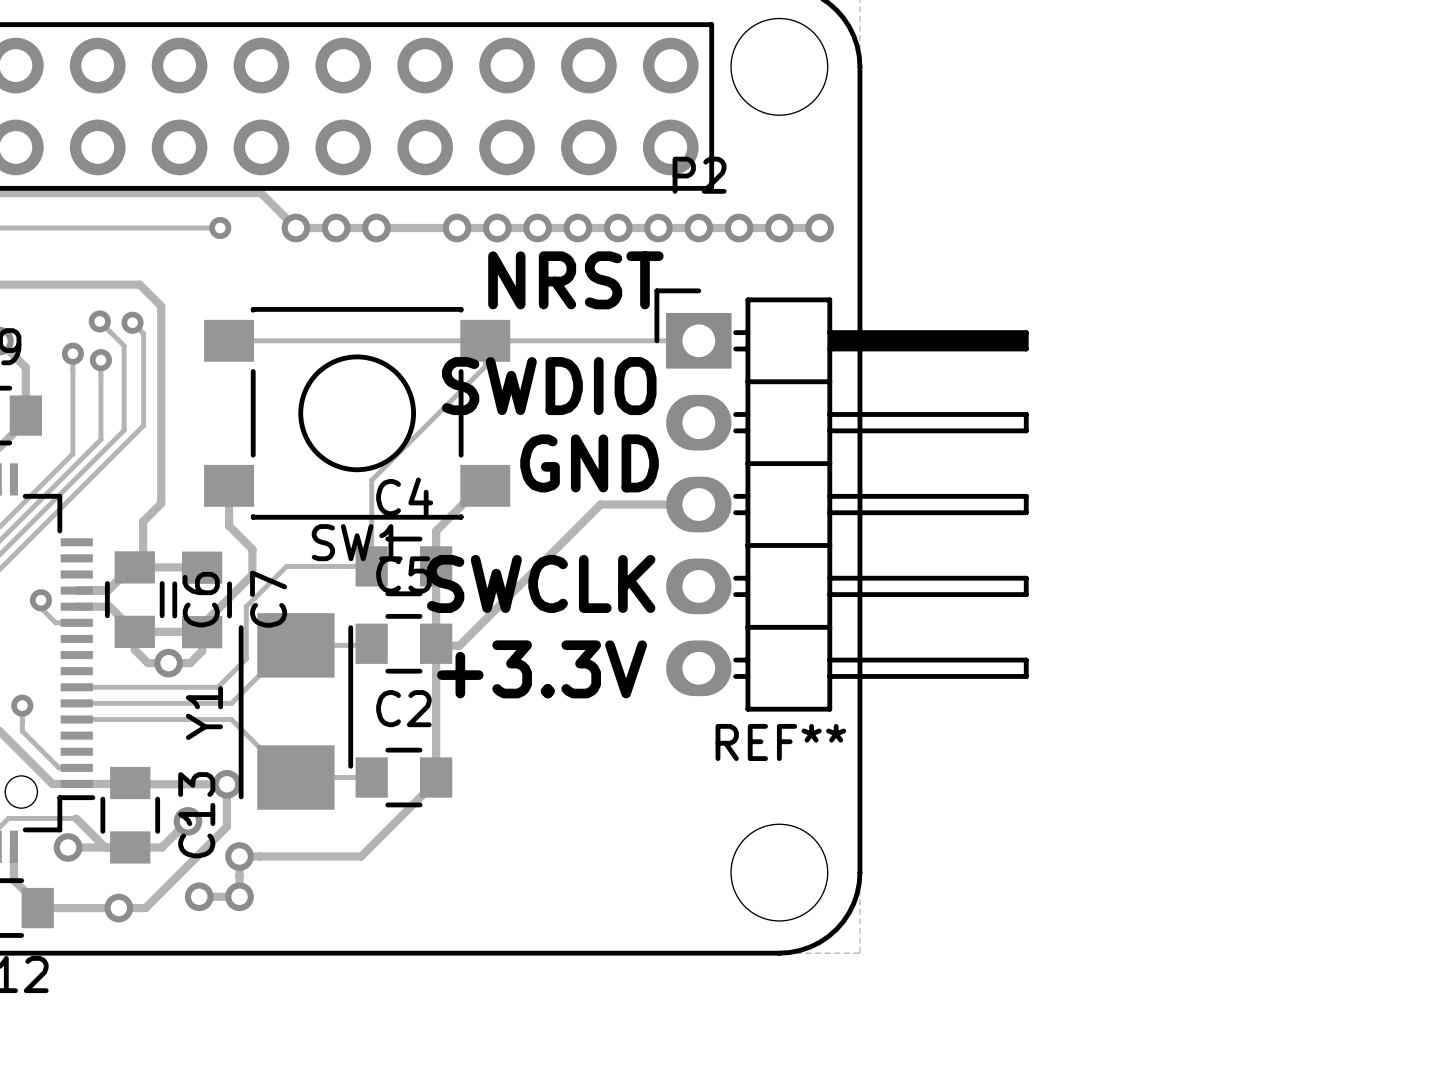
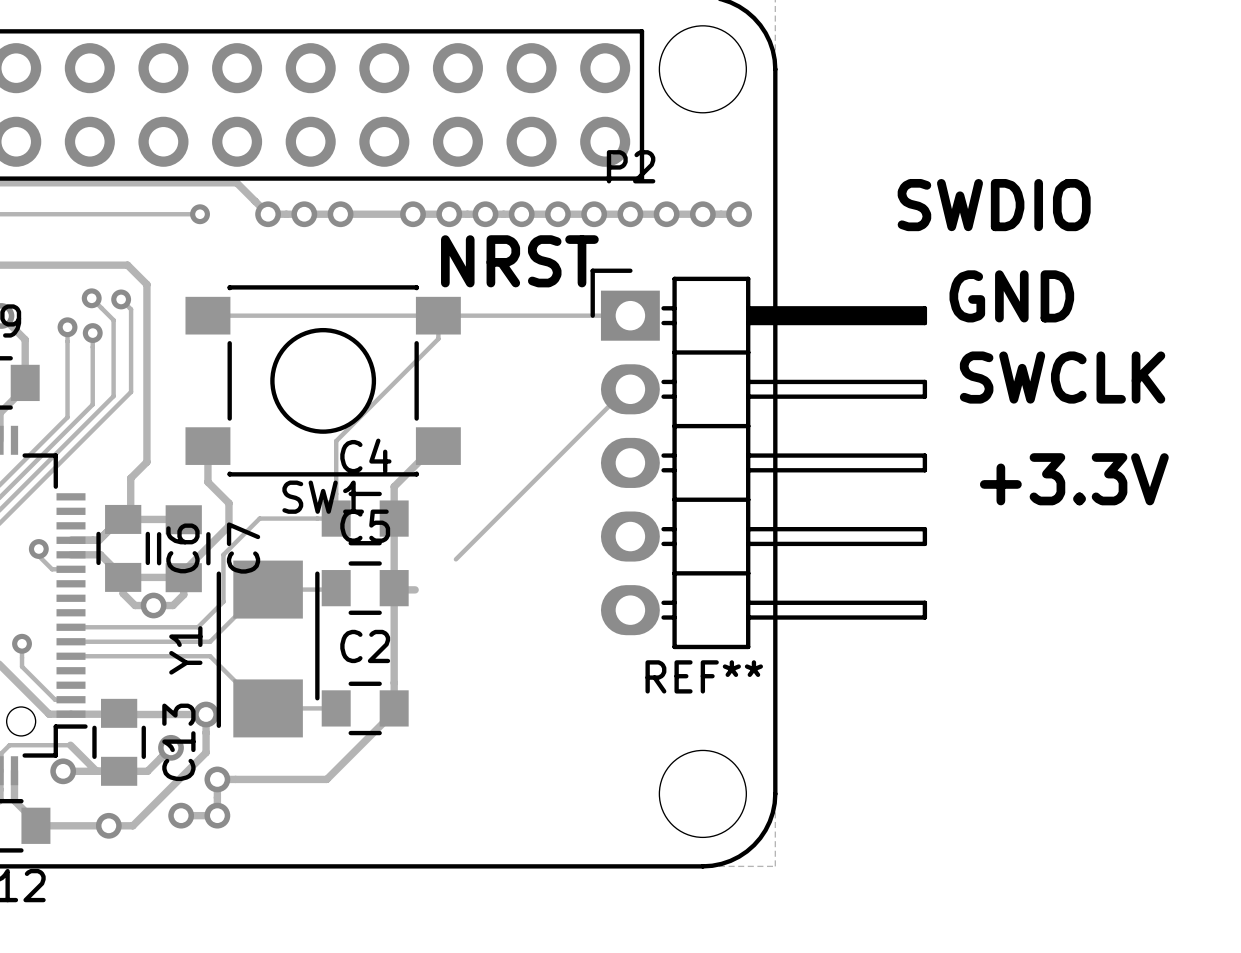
text position: SWDIO (549, 386) -> SWDIO (994, 205)
track: none -> (630, 389) (625, 389) (455, 559)
text position: GND (589, 463) -> GND (1011, 296)
track: (698, 504) (600, 504) (459, 645) -> none
text position: SWCLK (541, 583) -> SWCLK (1062, 377)
text position: +3.3V (542, 669) -> +3.3V (1074, 479)

